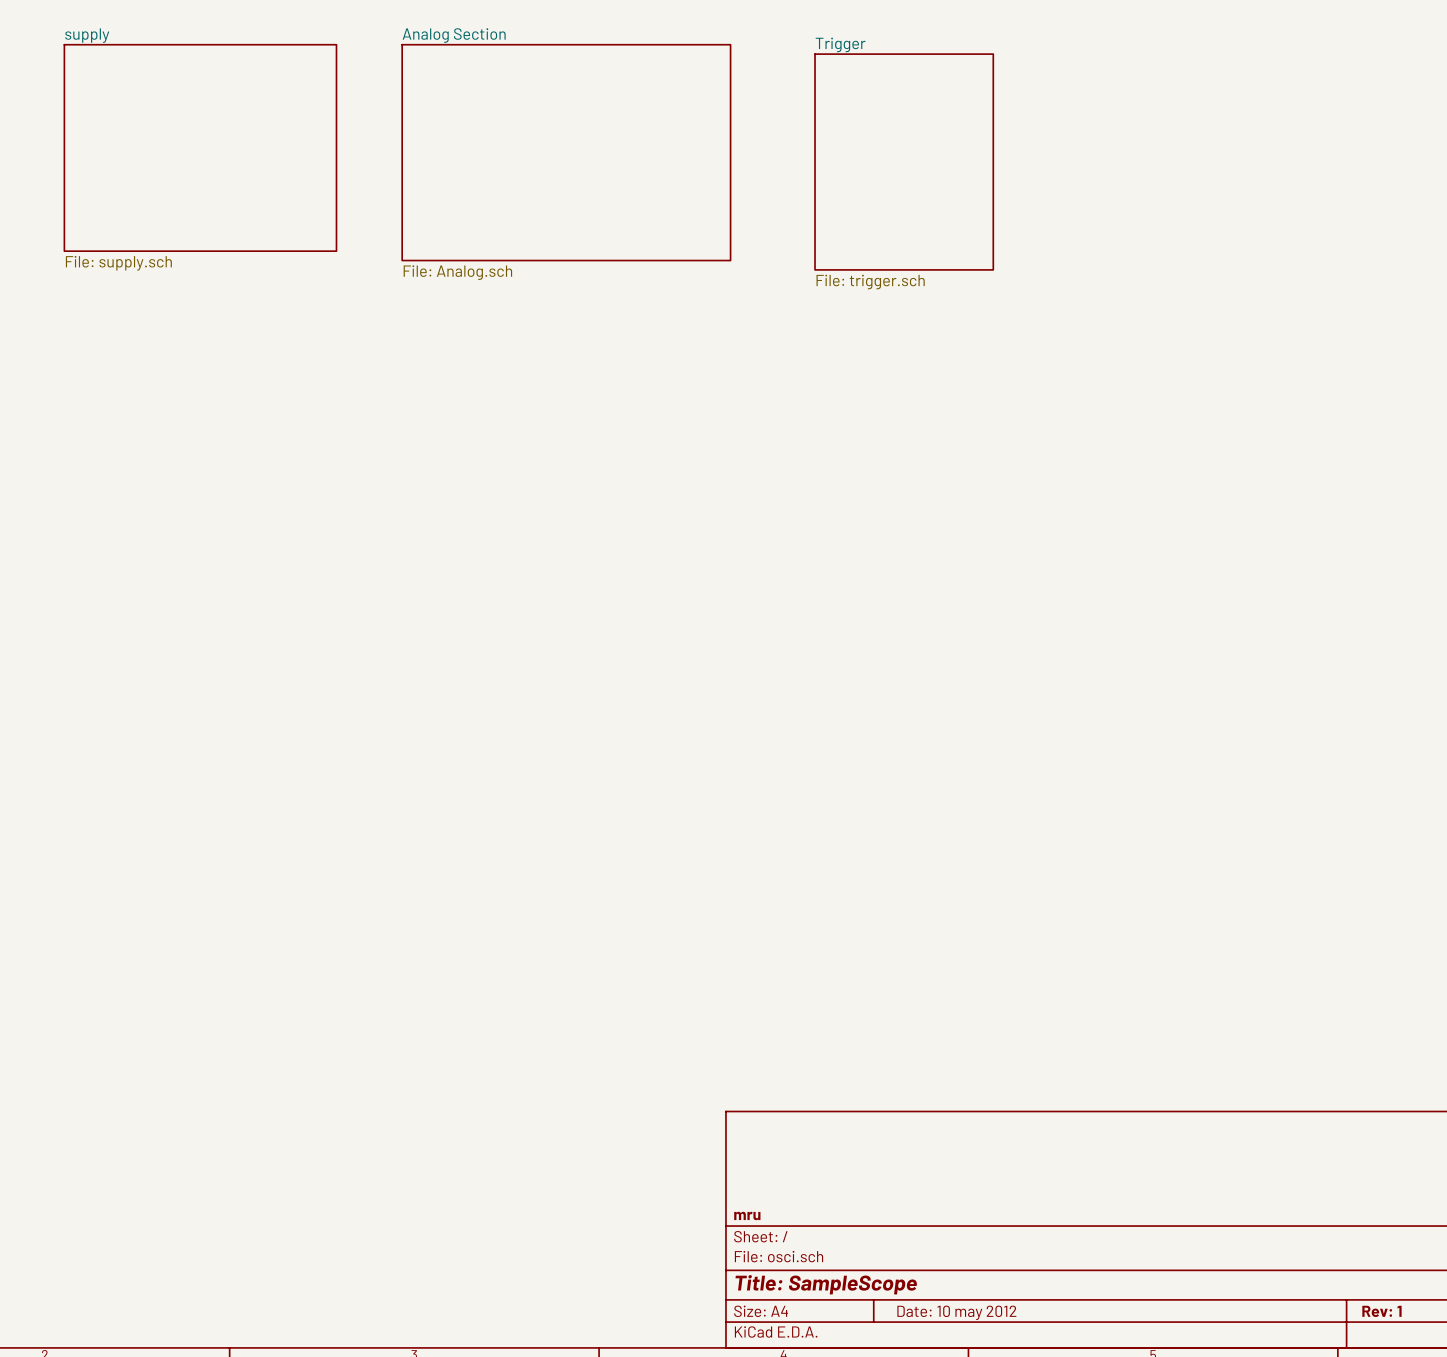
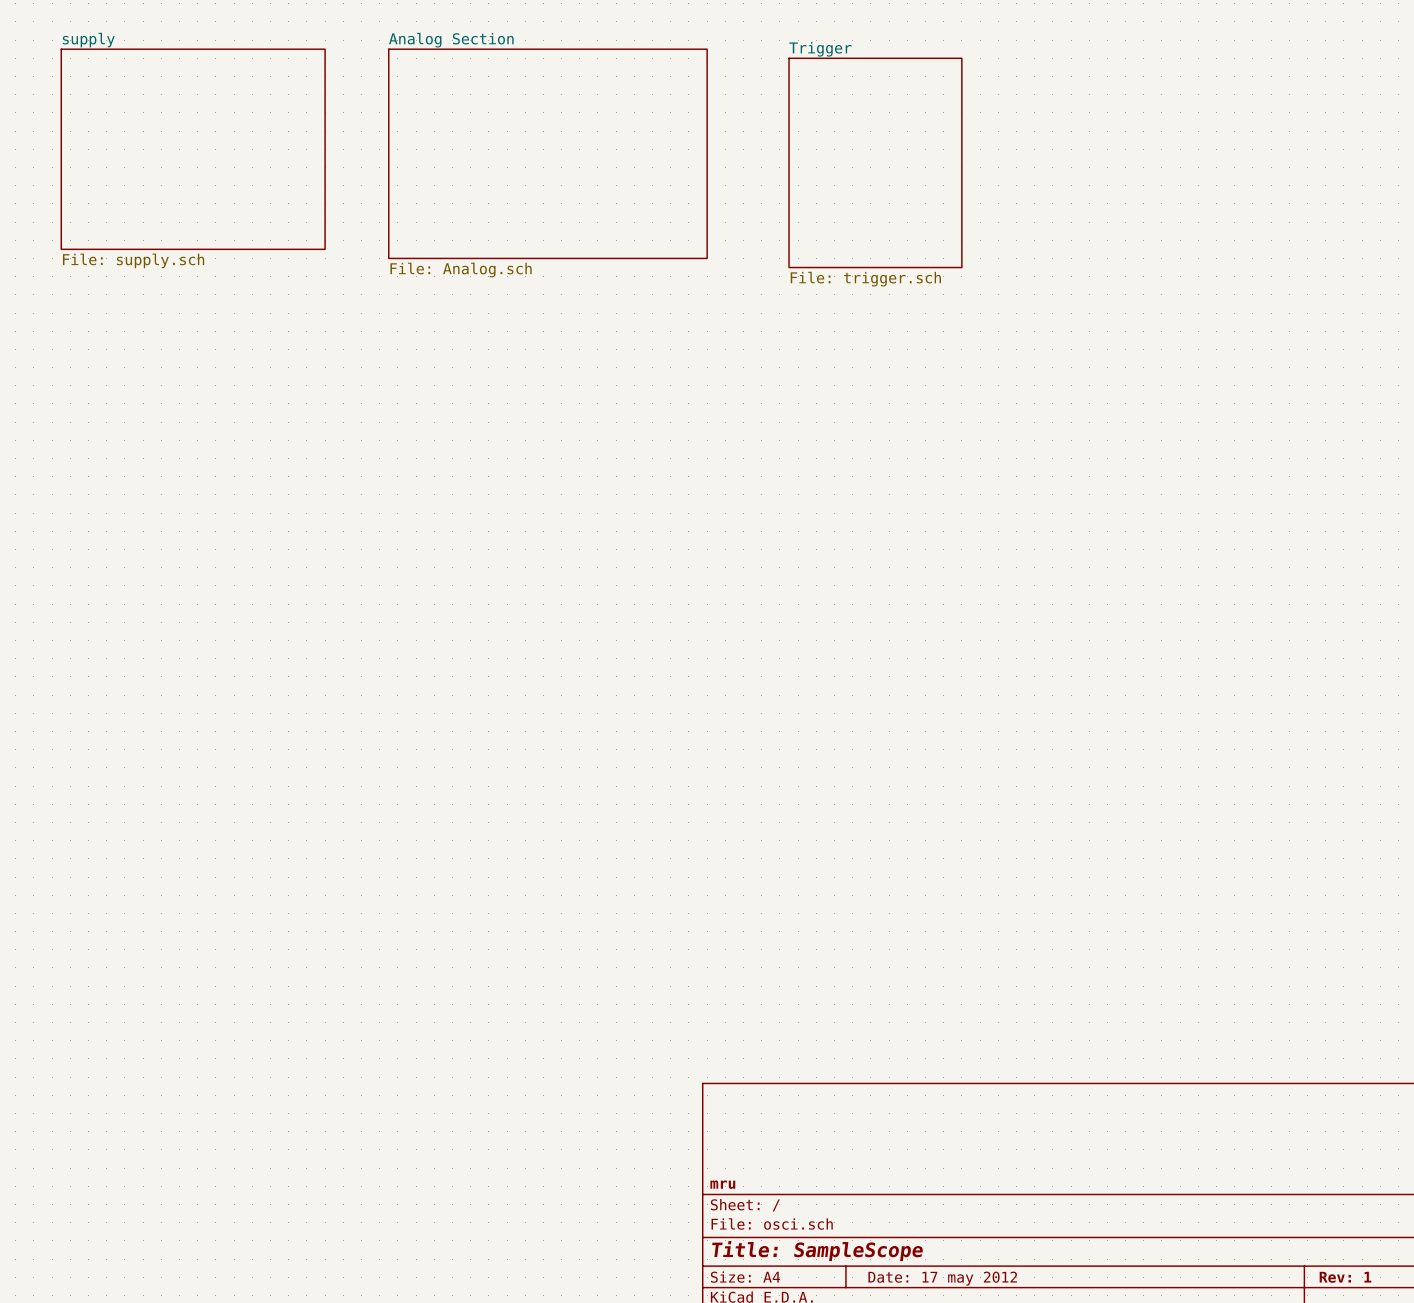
title block: Date: 10 may 2012 (956, 1312) -> Date: 17 may 2012 (942, 1278)

